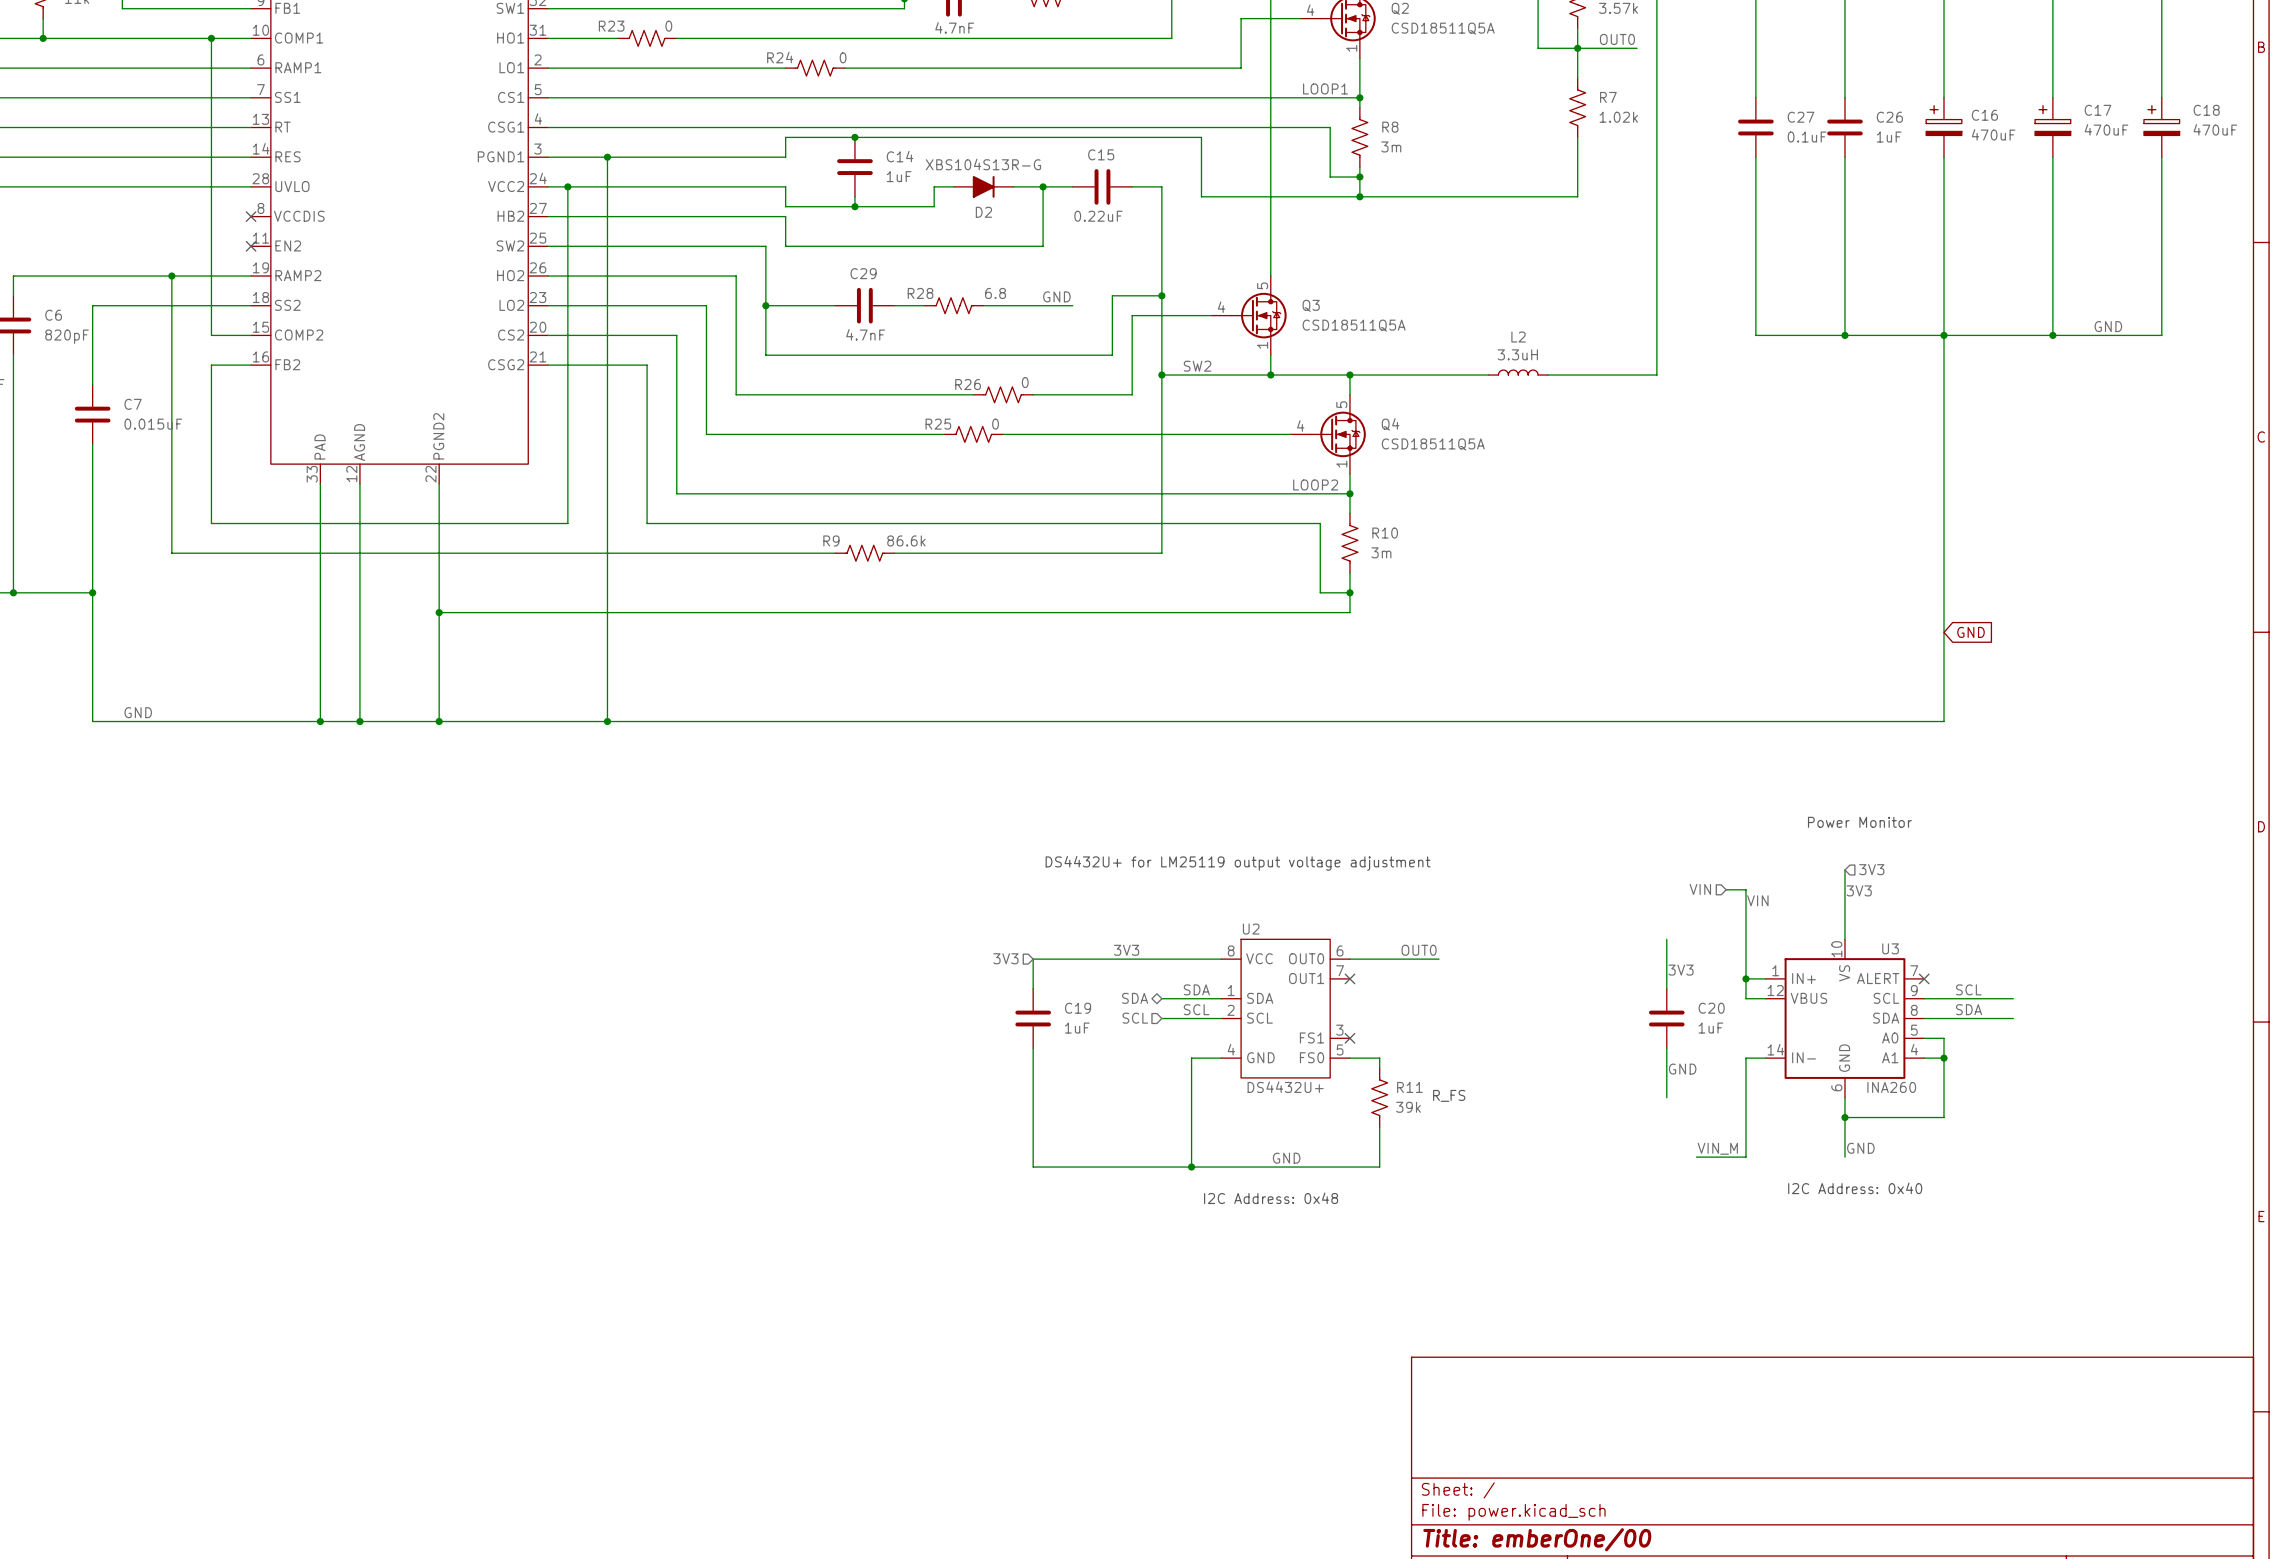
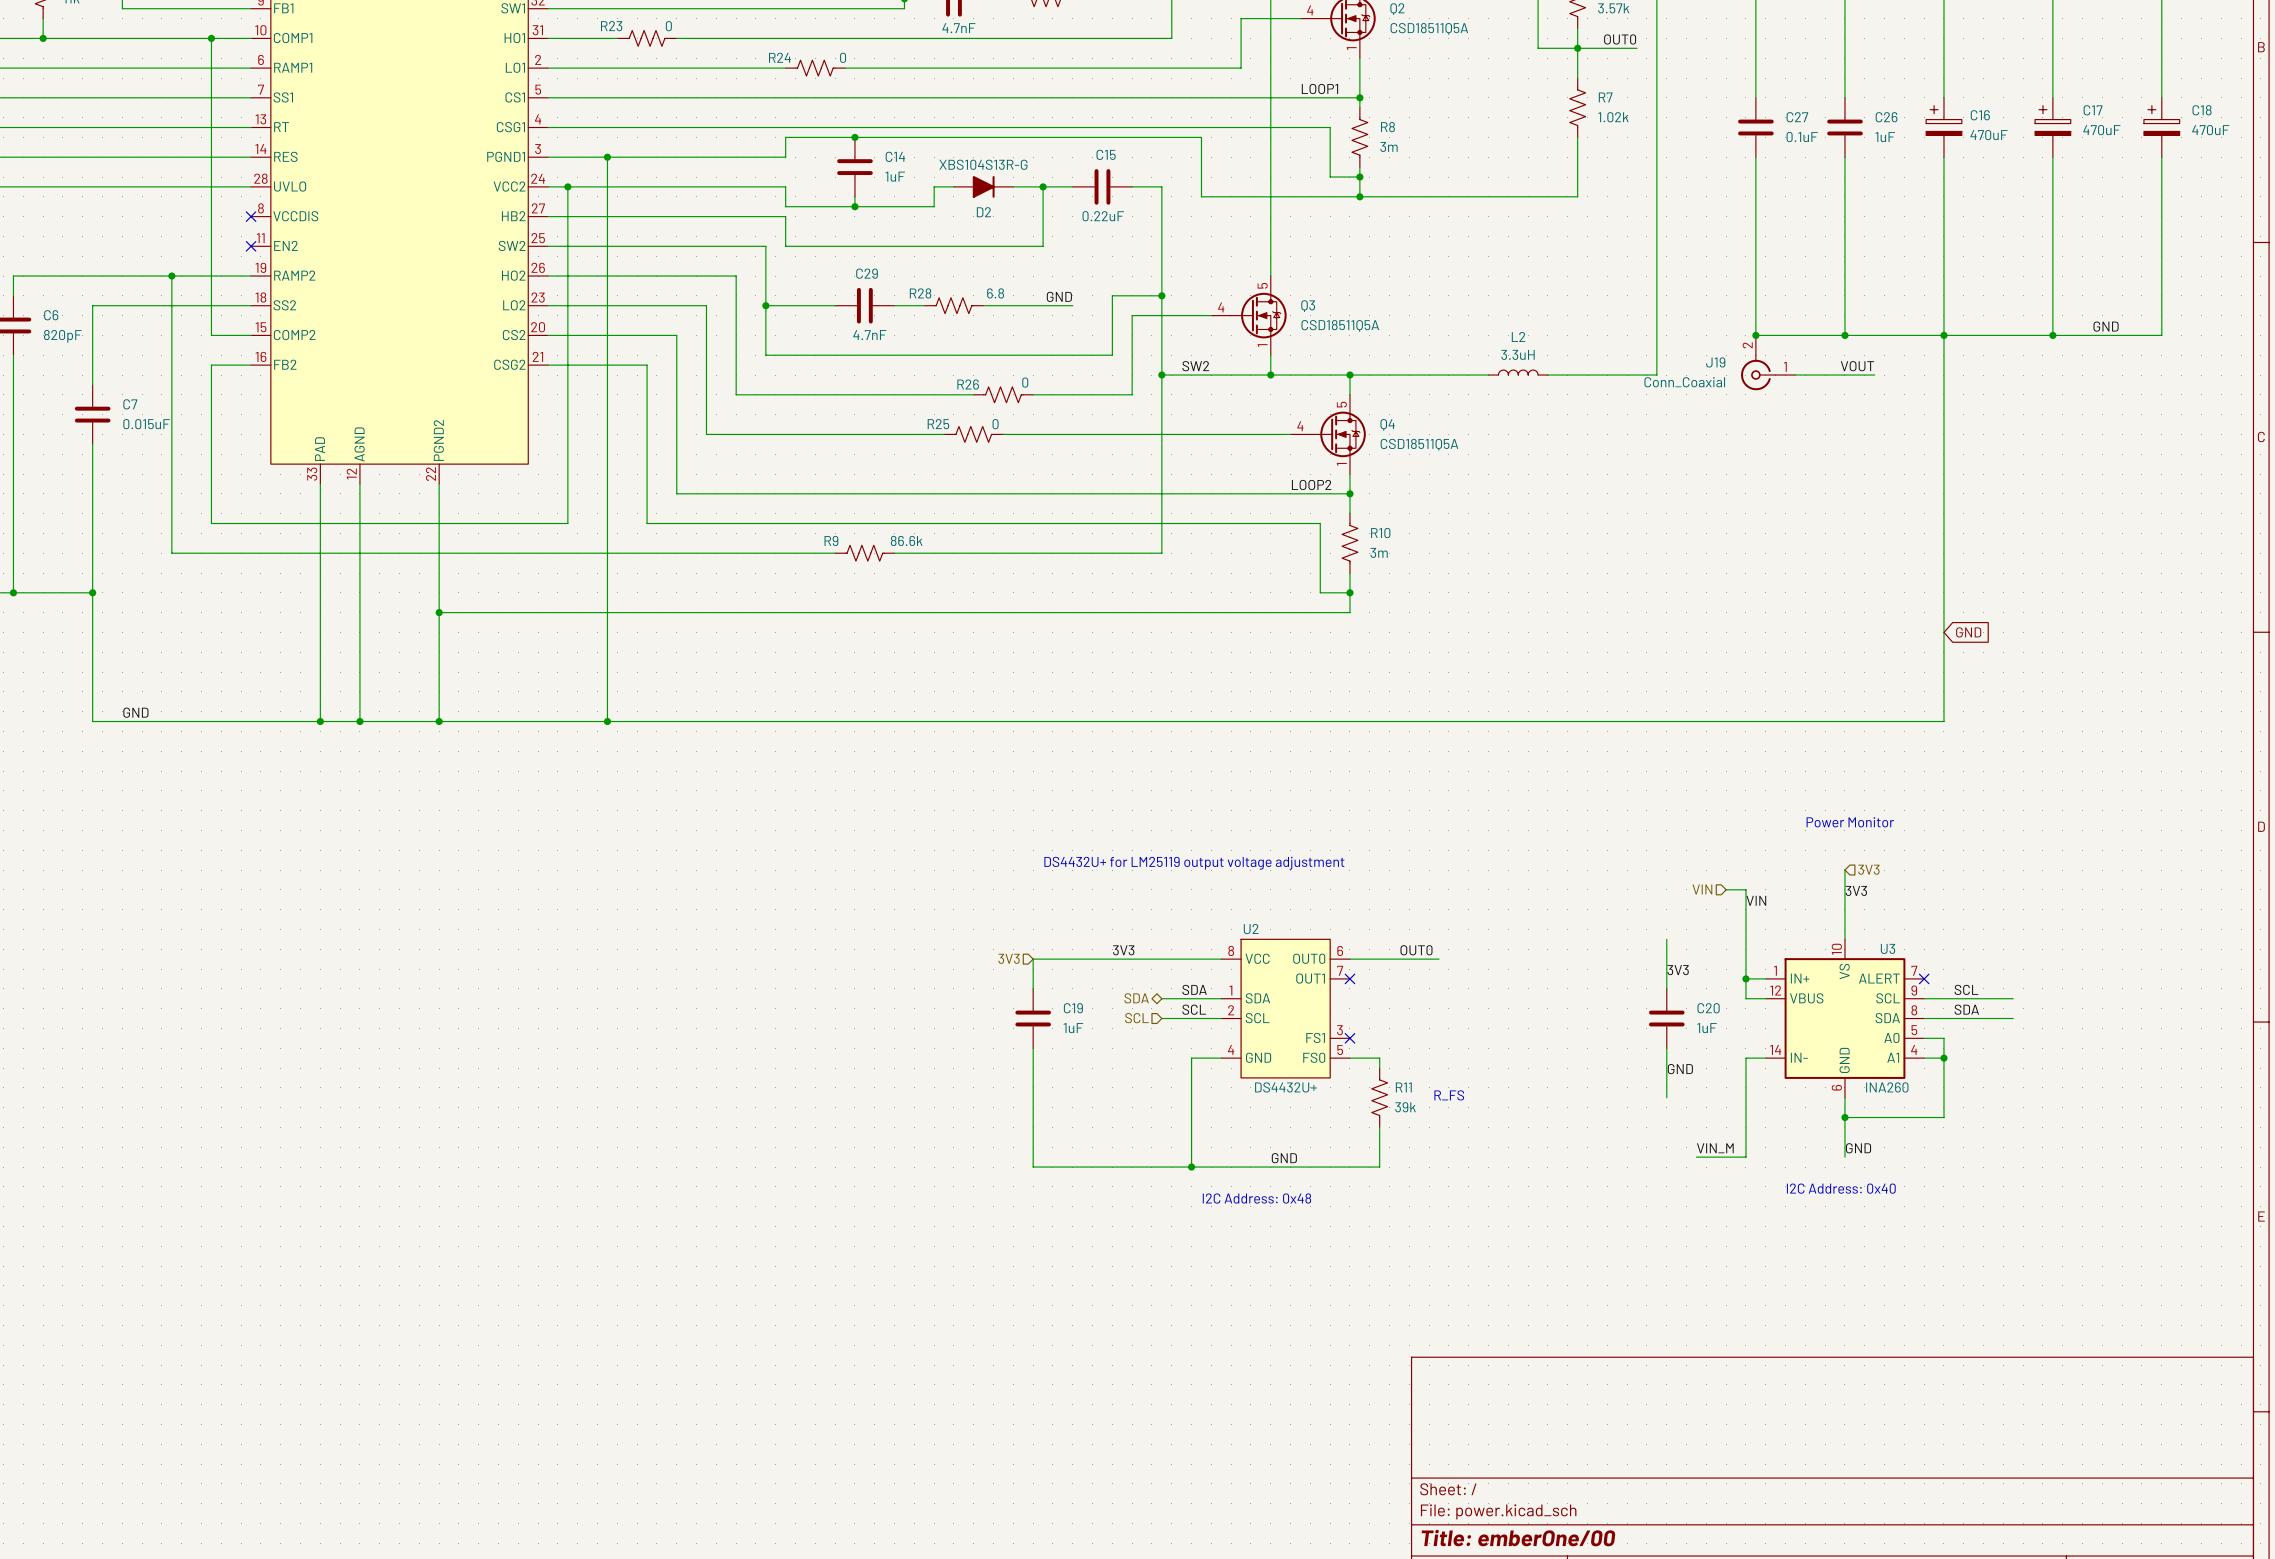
junction: none -> (1755, 335)
J19: none -> Conn_Coaxial (1768, 362)
label: none -> VOUT (1857, 366)
wire: none -> (1795, 375) (1874, 375)

